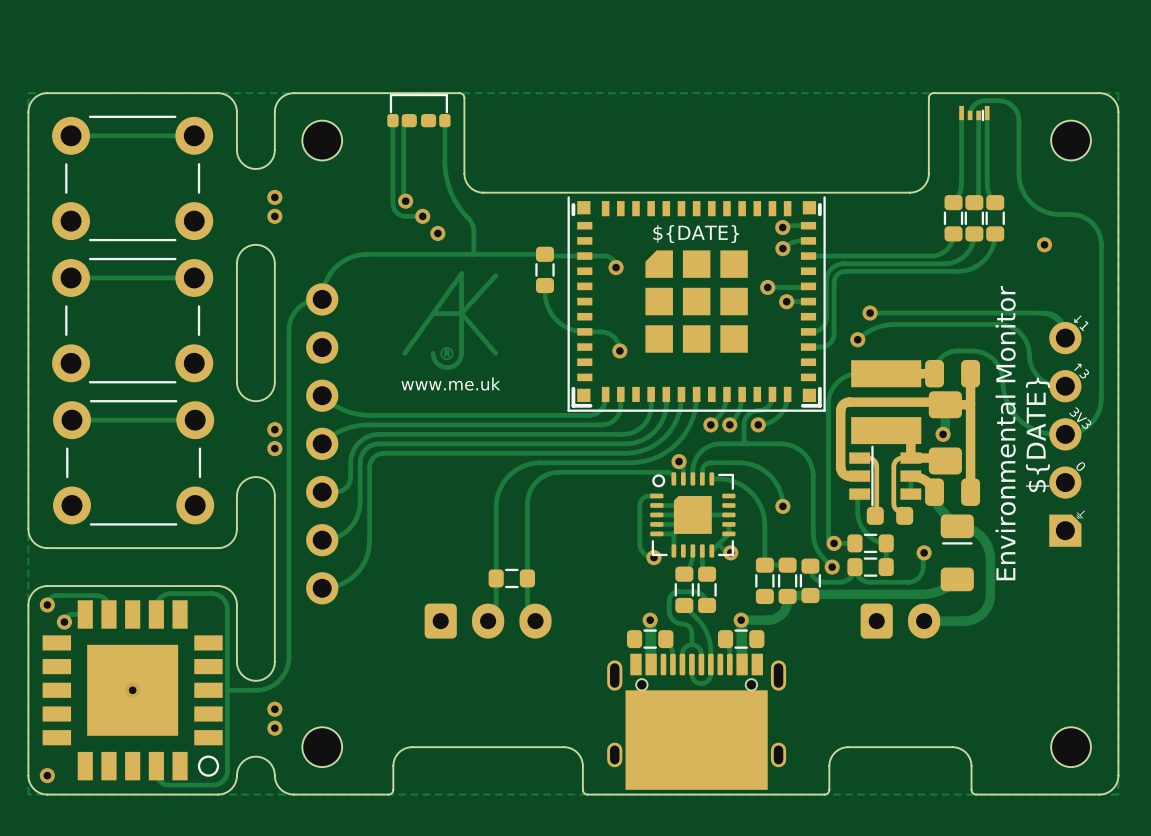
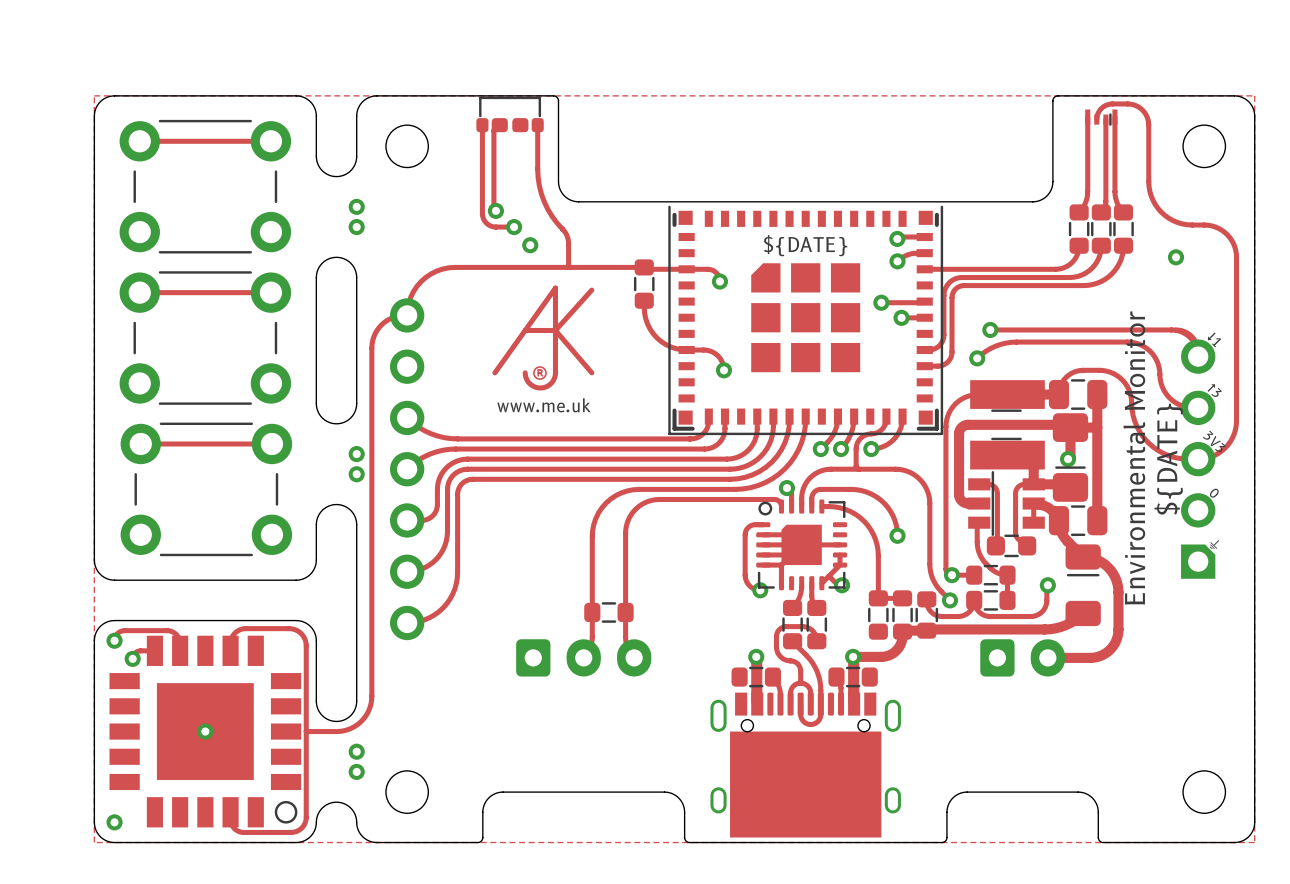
drawing: none -> [1070, 379, 1086, 410]
drawing: none -> [991, 409, 1022, 441]
drawing: none -> [1055, 466, 1086, 469]
drawing: none -> [1070, 505, 1086, 537]
drawing: none -> [1004, 534, 1019, 558]

